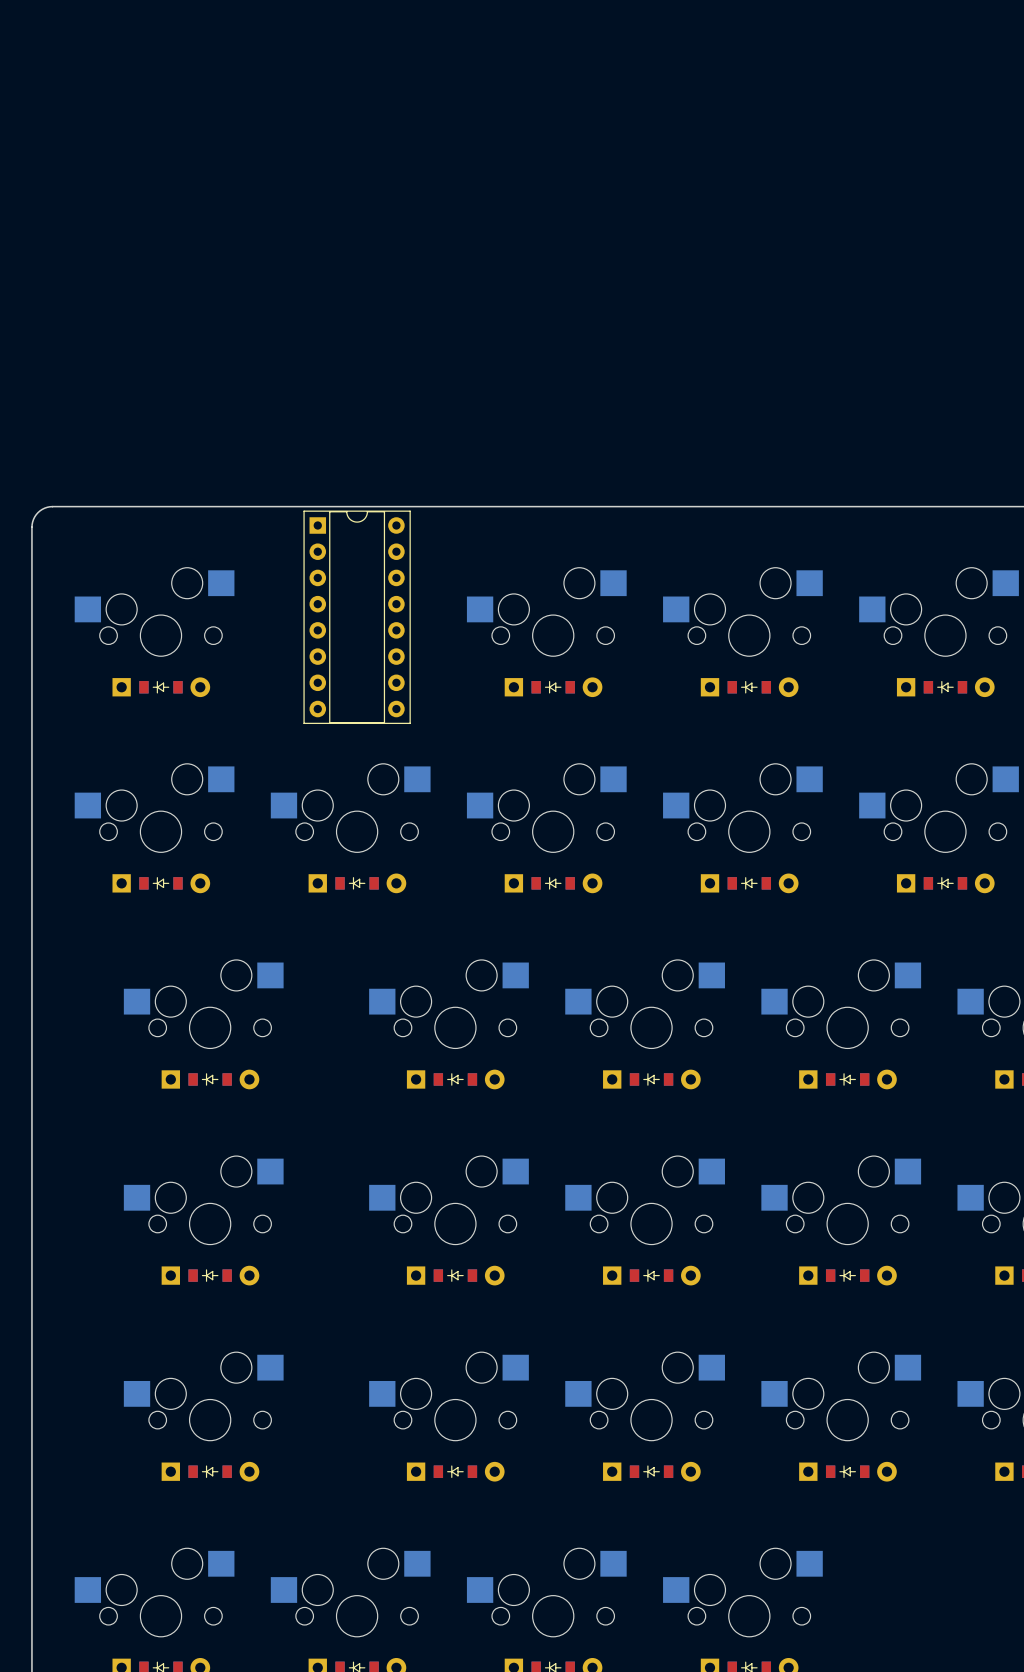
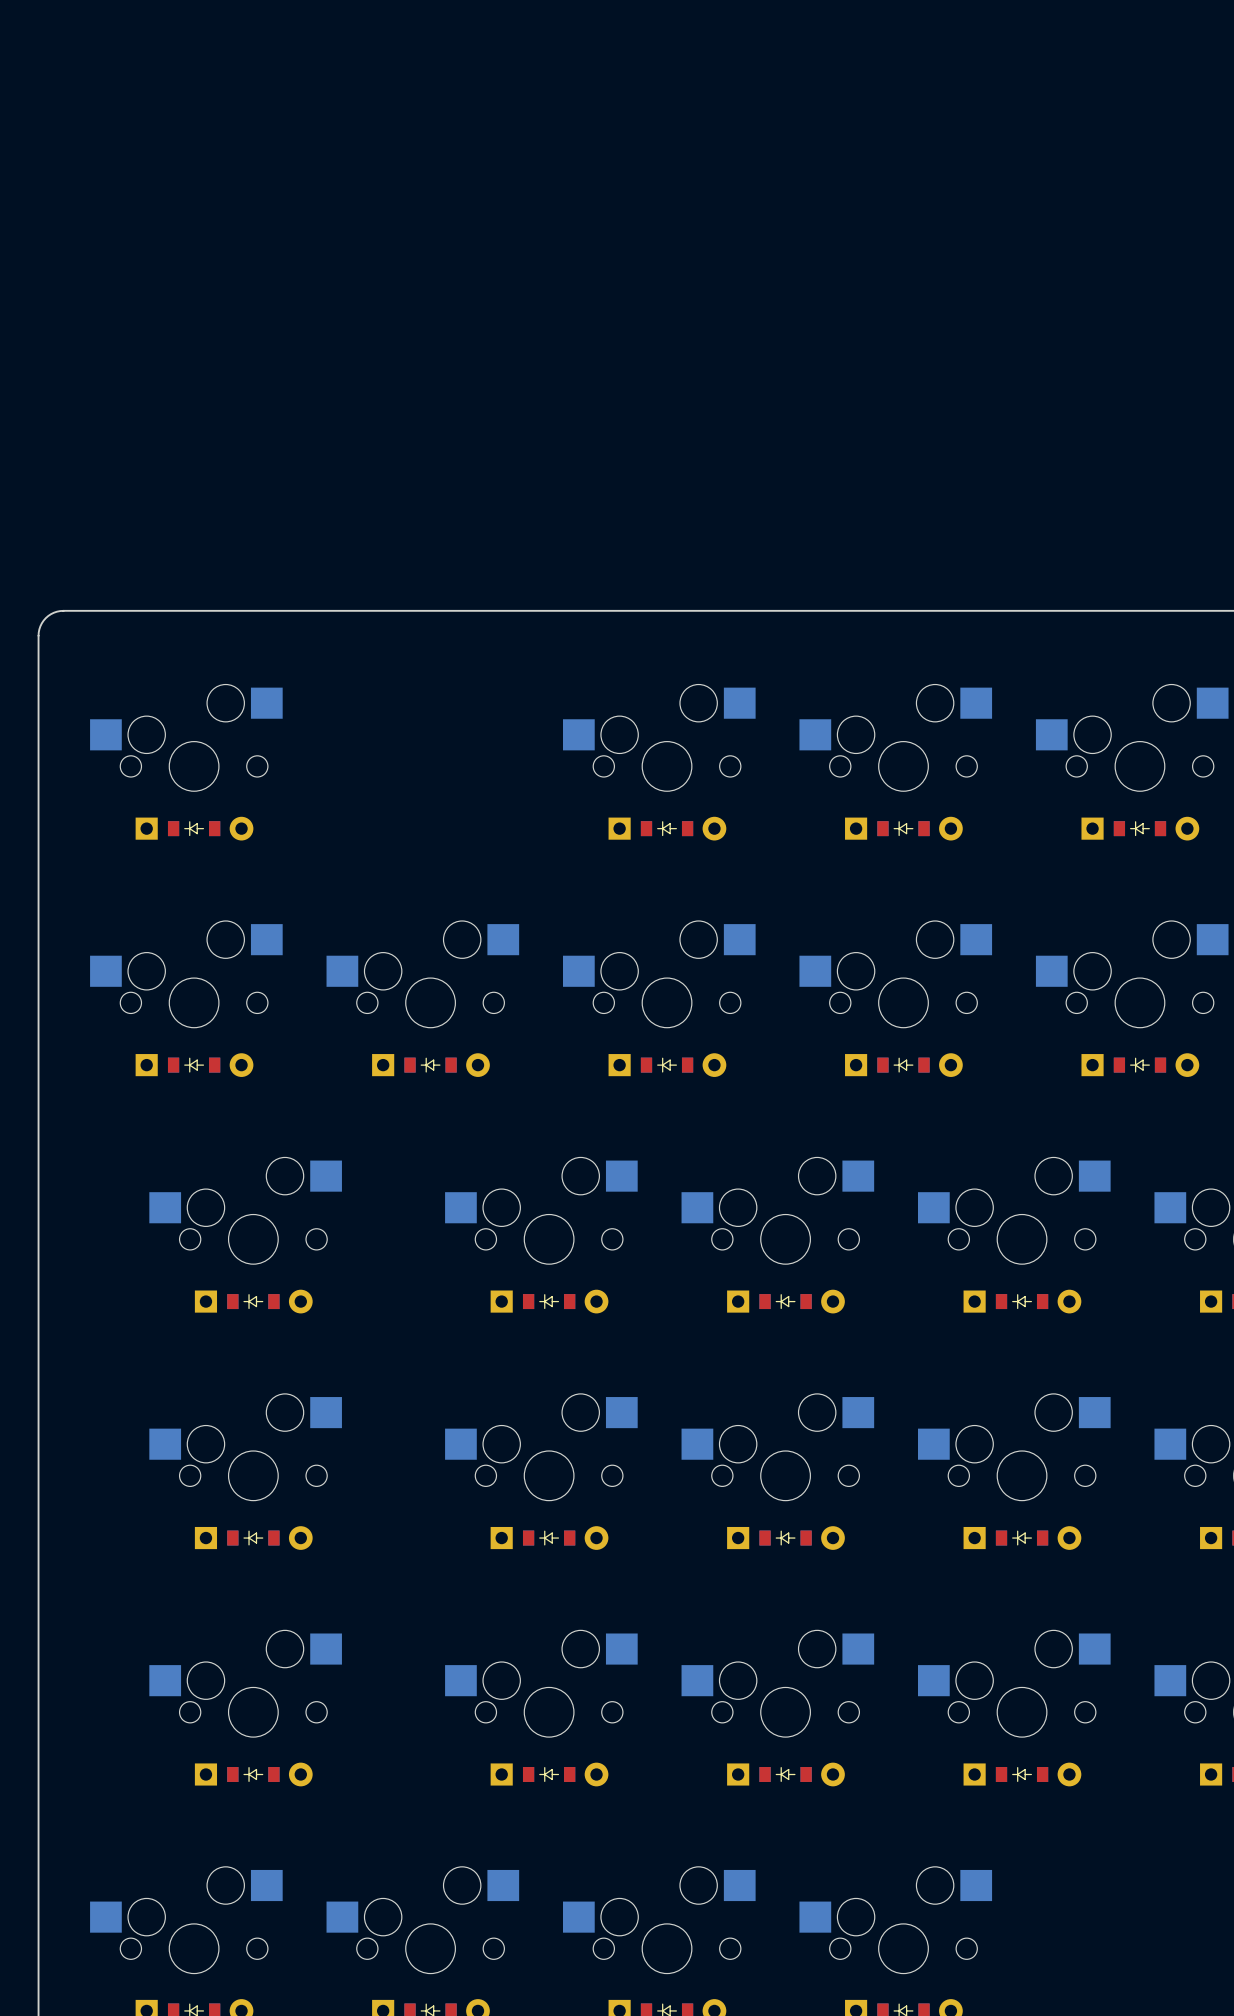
part: (357, 617) -> none

